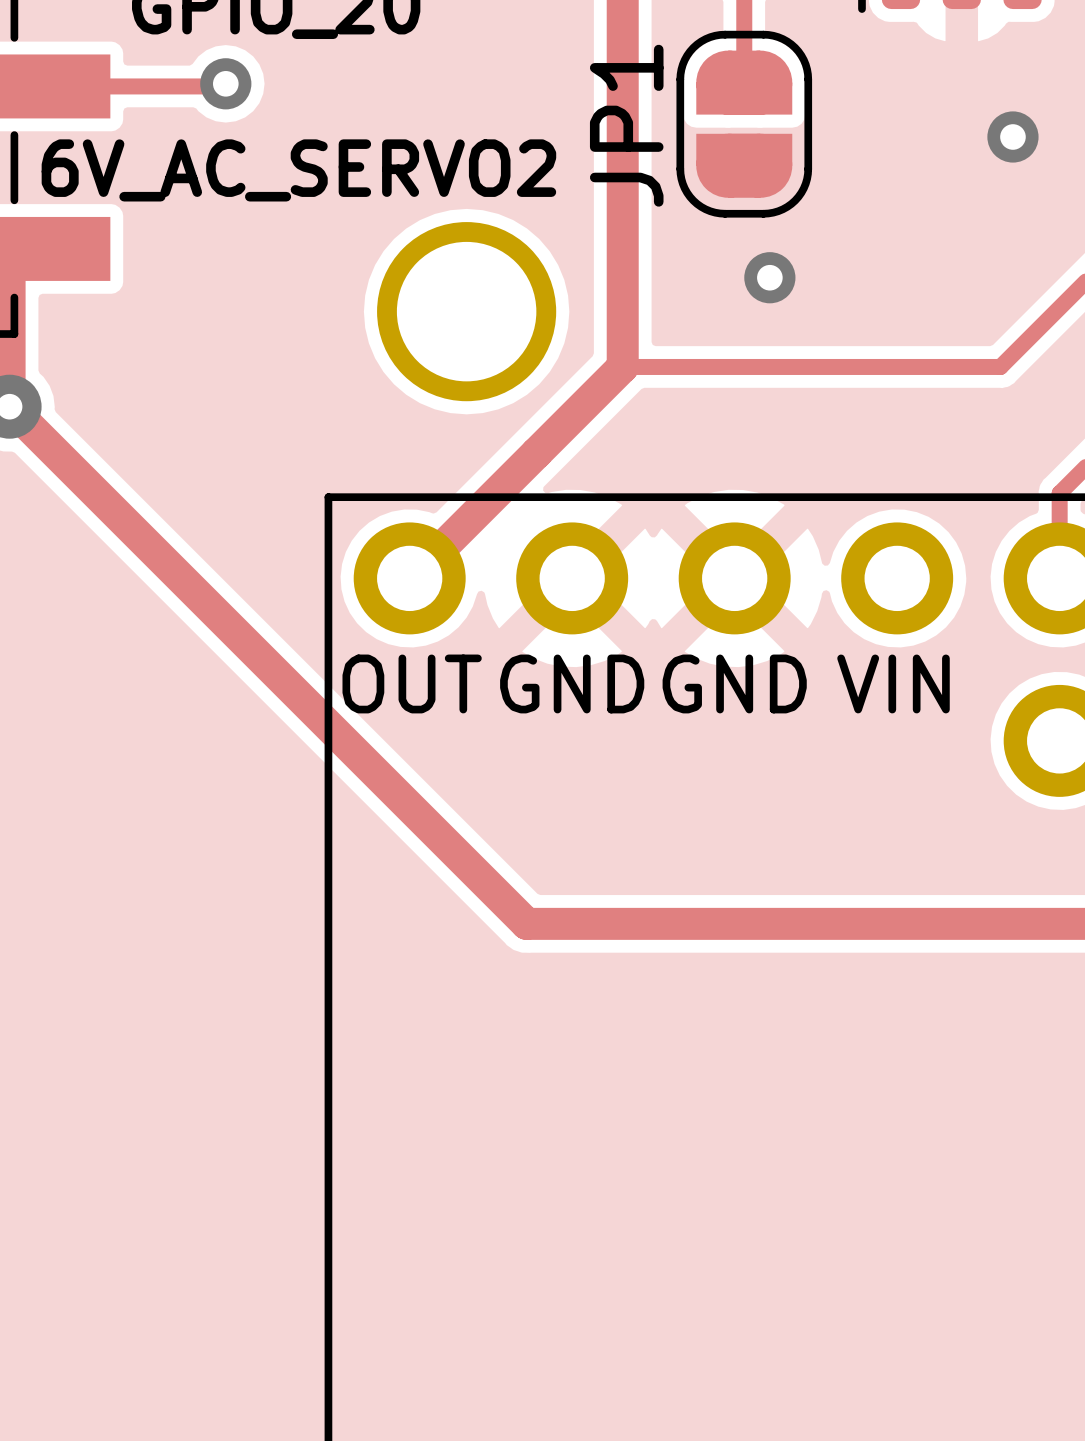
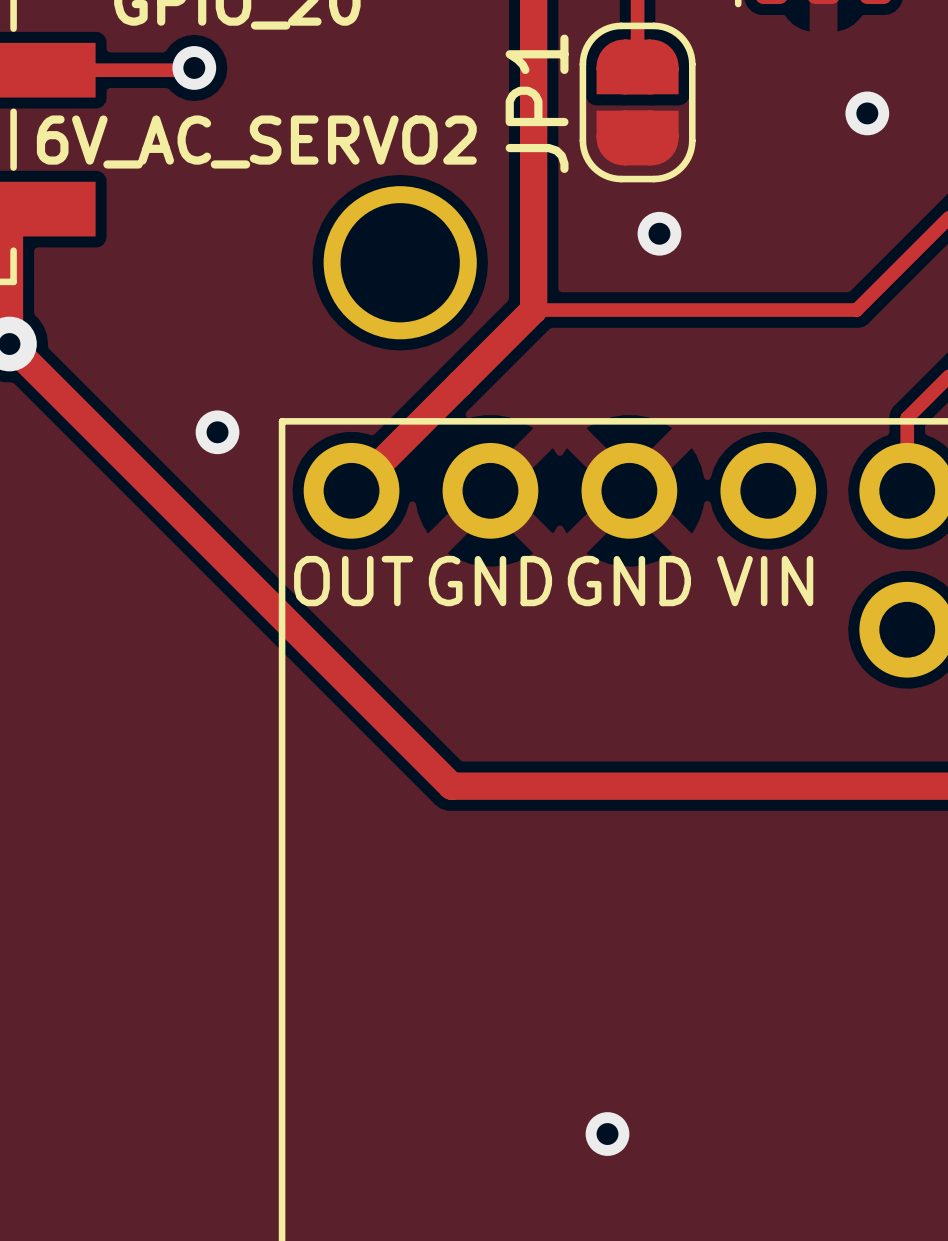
via: none -> (217, 432)
via: none -> (607, 1134)

